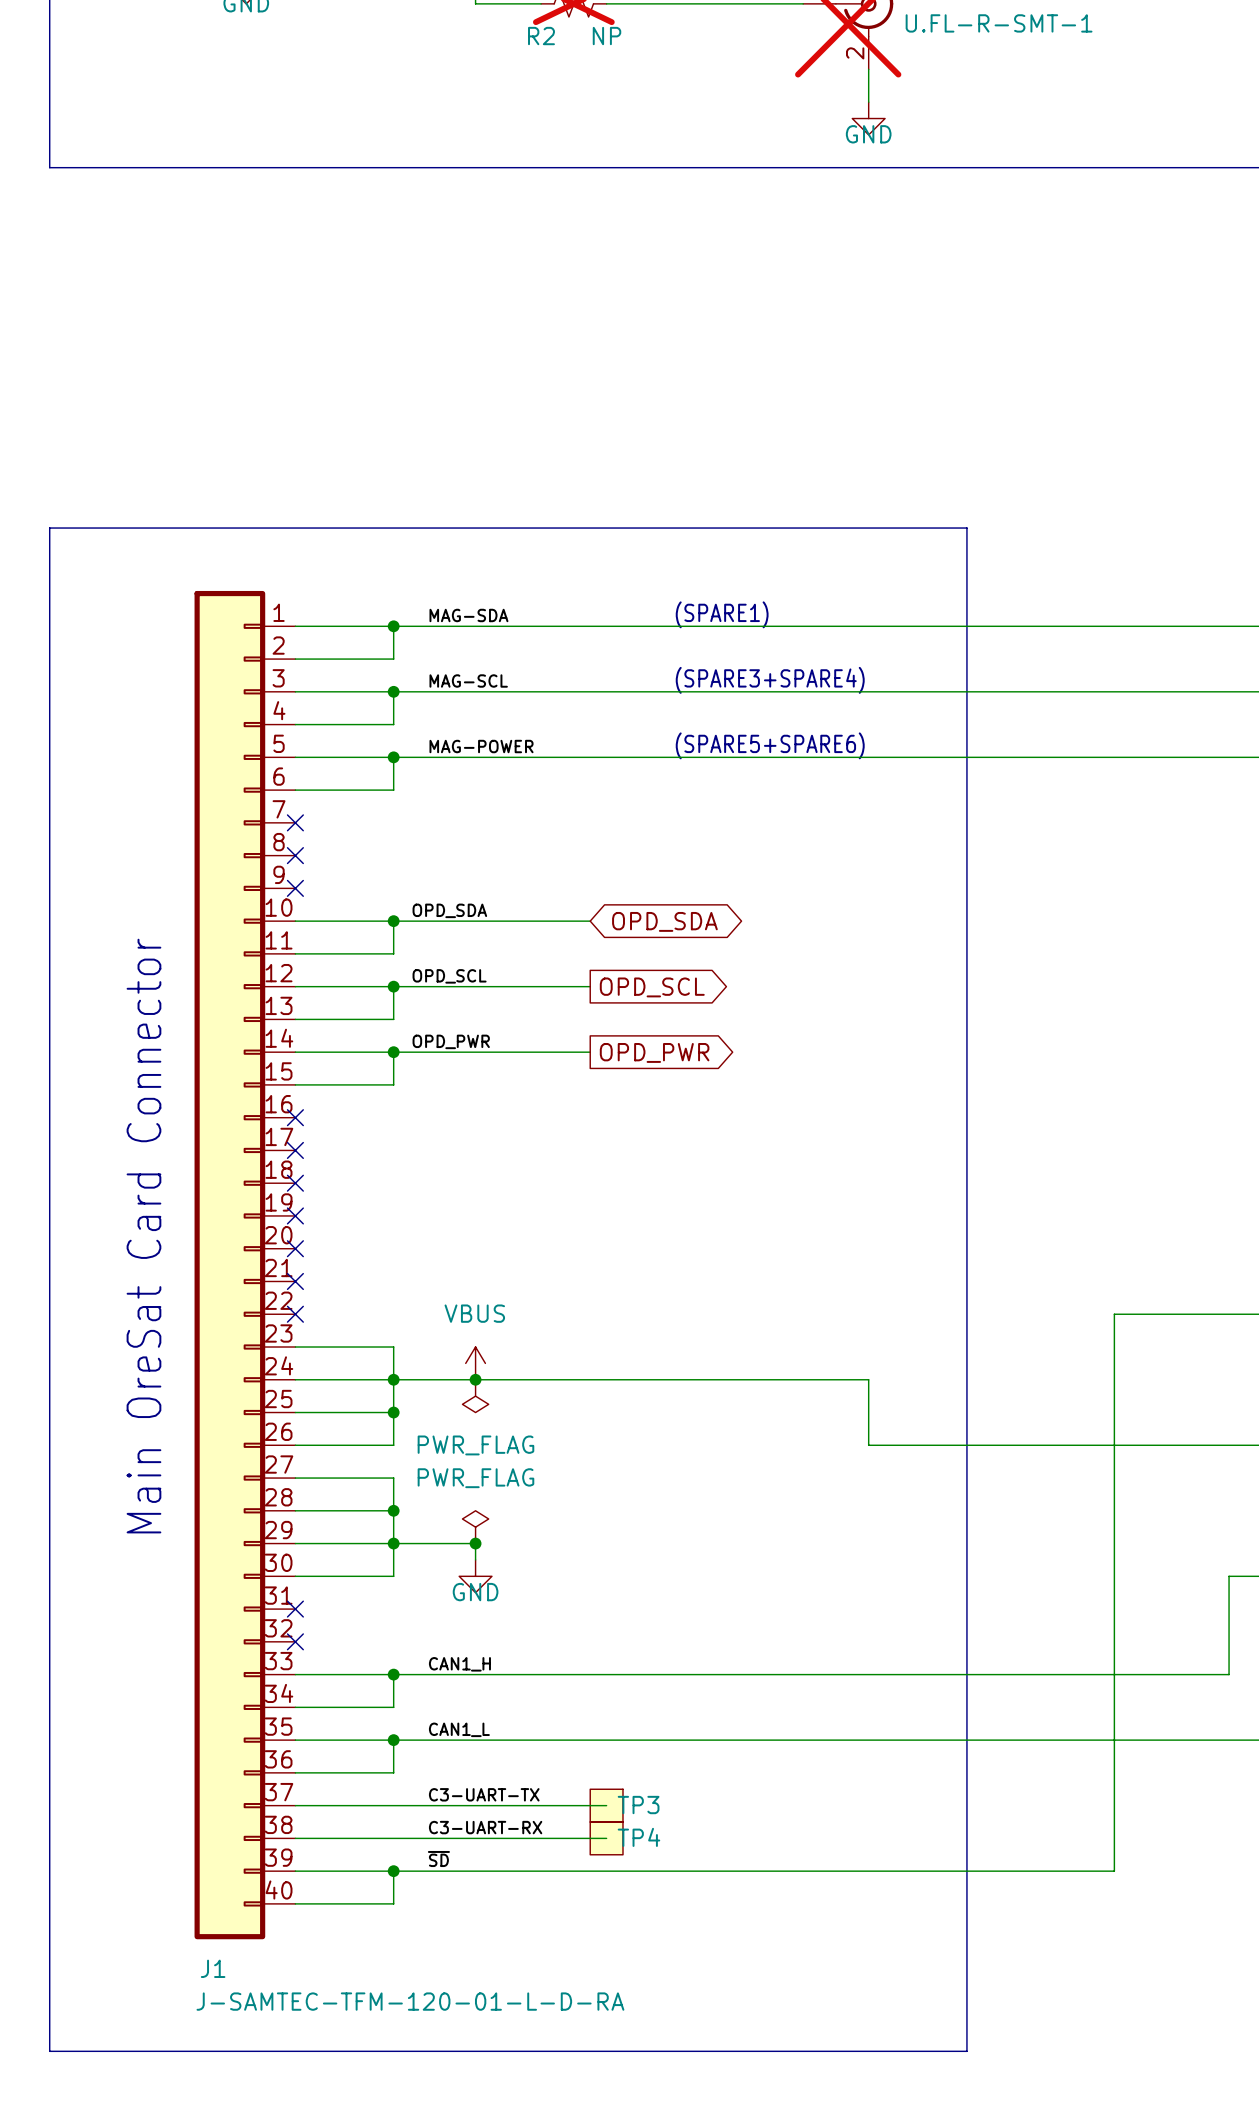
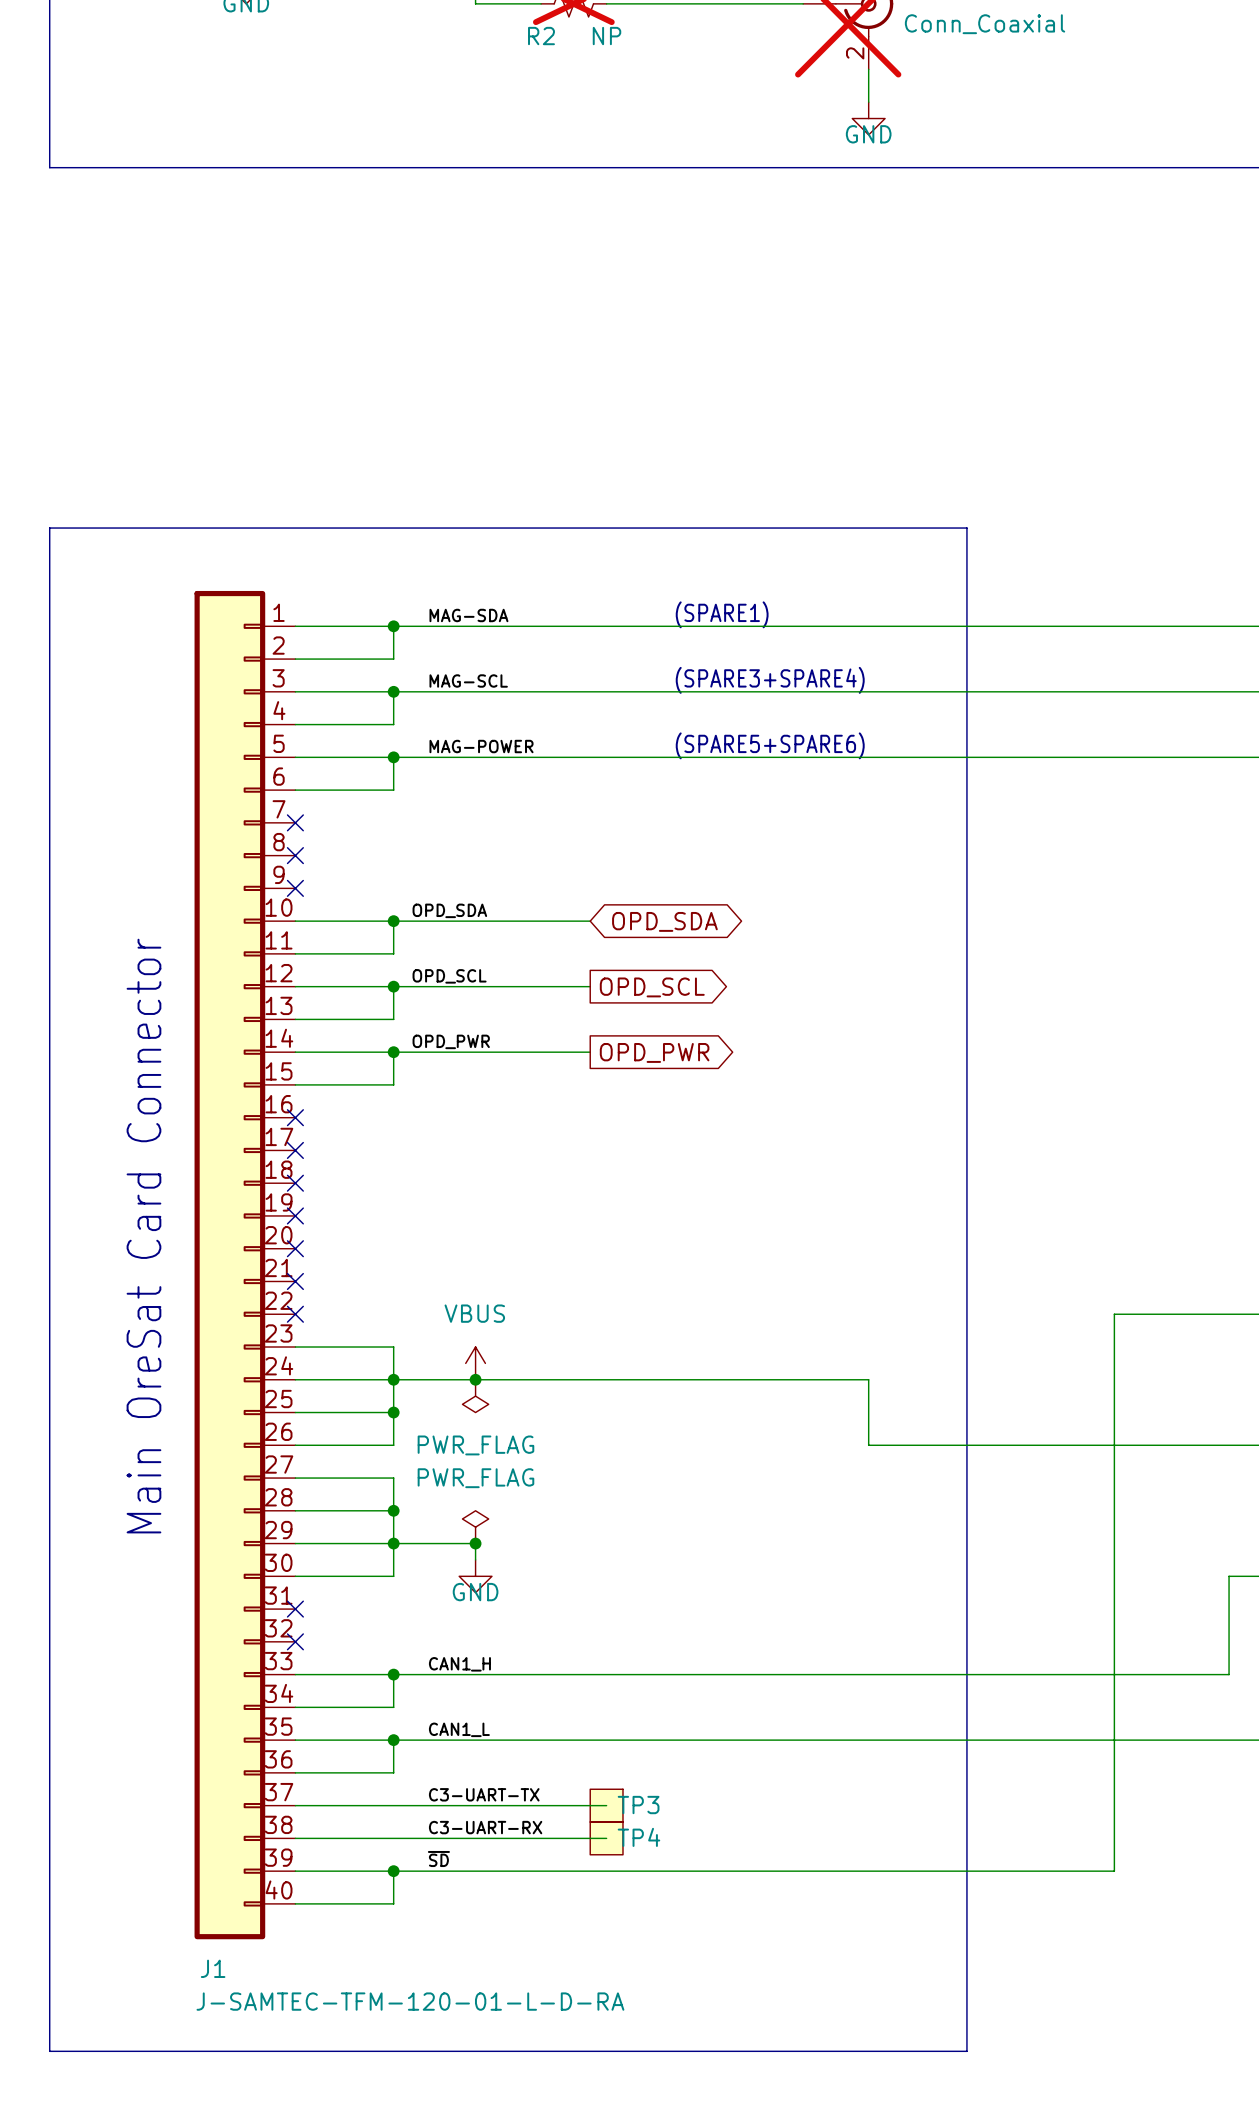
part value: U.FL-R-SMT-1 (999, 23) -> Conn_Coaxial (985, 24)

